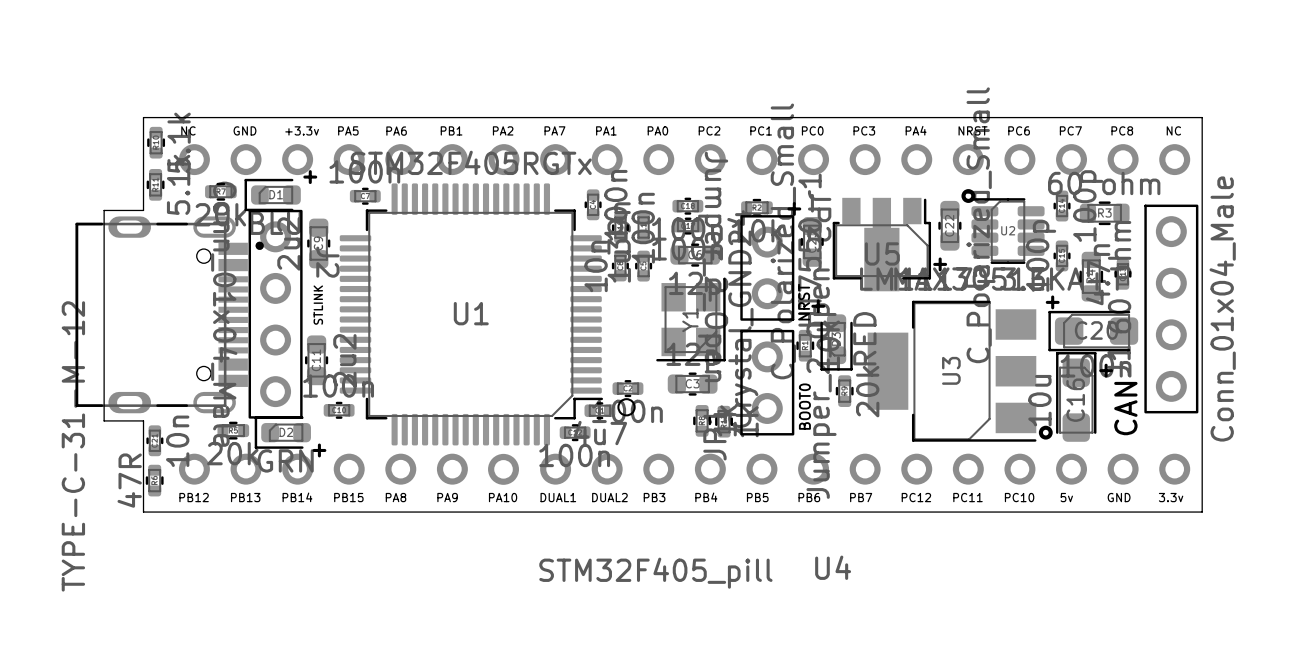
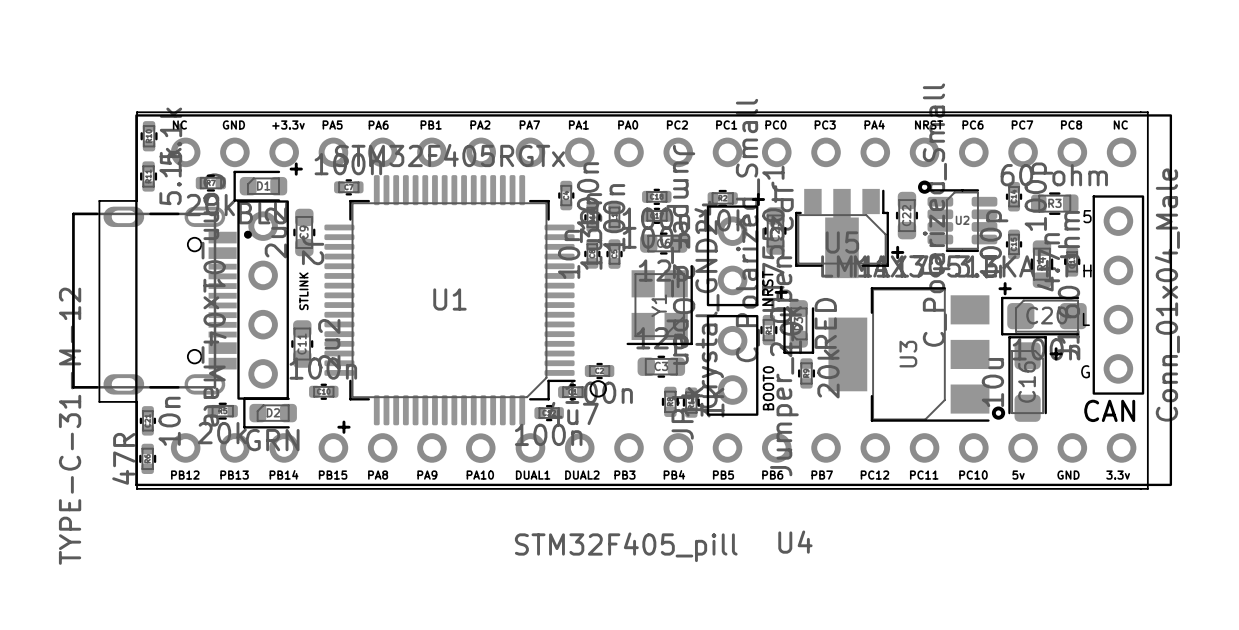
U4 footprint: [178, 144, 1191, 485] -> [135, 114, 1173, 487]
text: none -> 5 (1087, 216)
text: none -> H (1087, 270)
text: none -> L (1086, 319)
text: none -> G (1085, 371)
text rotation: 0° (1125, 408) -> 90° clockwise (1109, 410)
text position: + (319, 450) -> + (343, 427)

